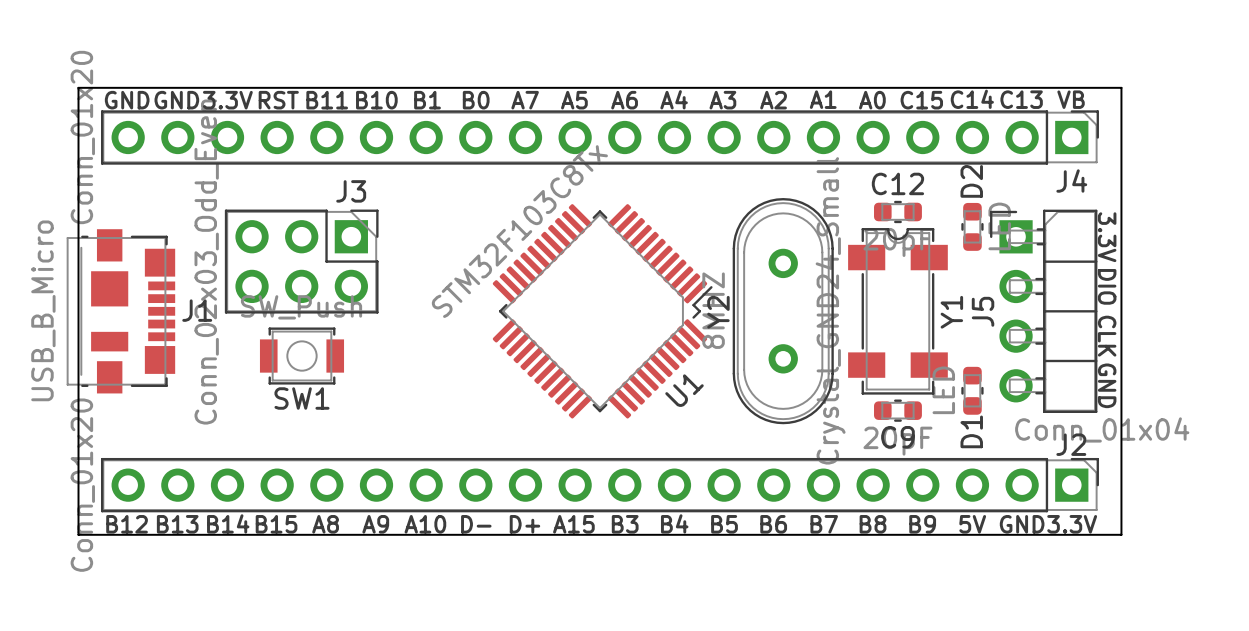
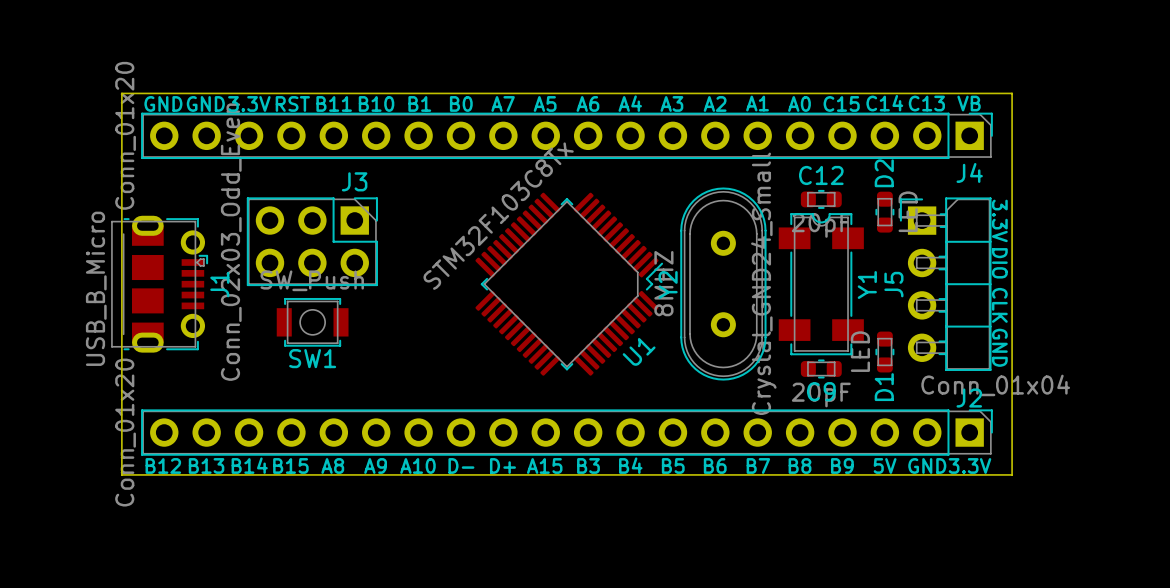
J1 footprint: [66, 229, 176, 394] -> [111, 215, 209, 353]

